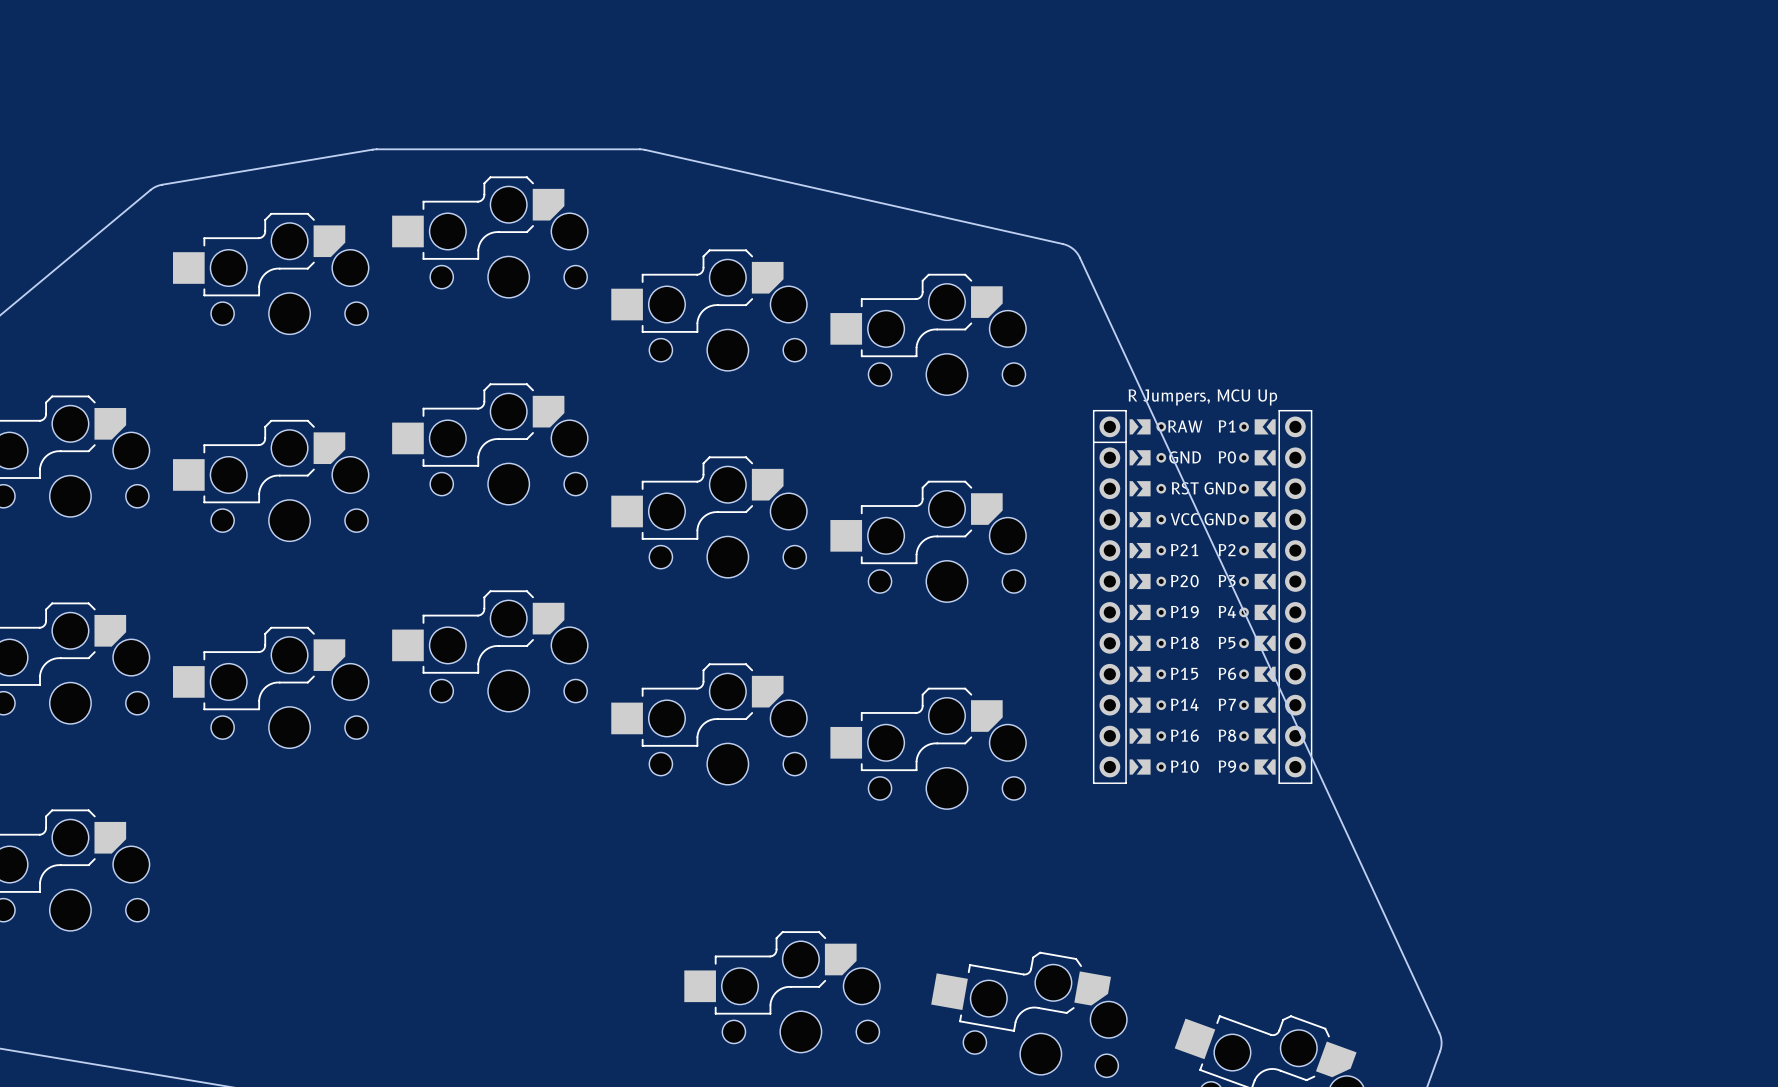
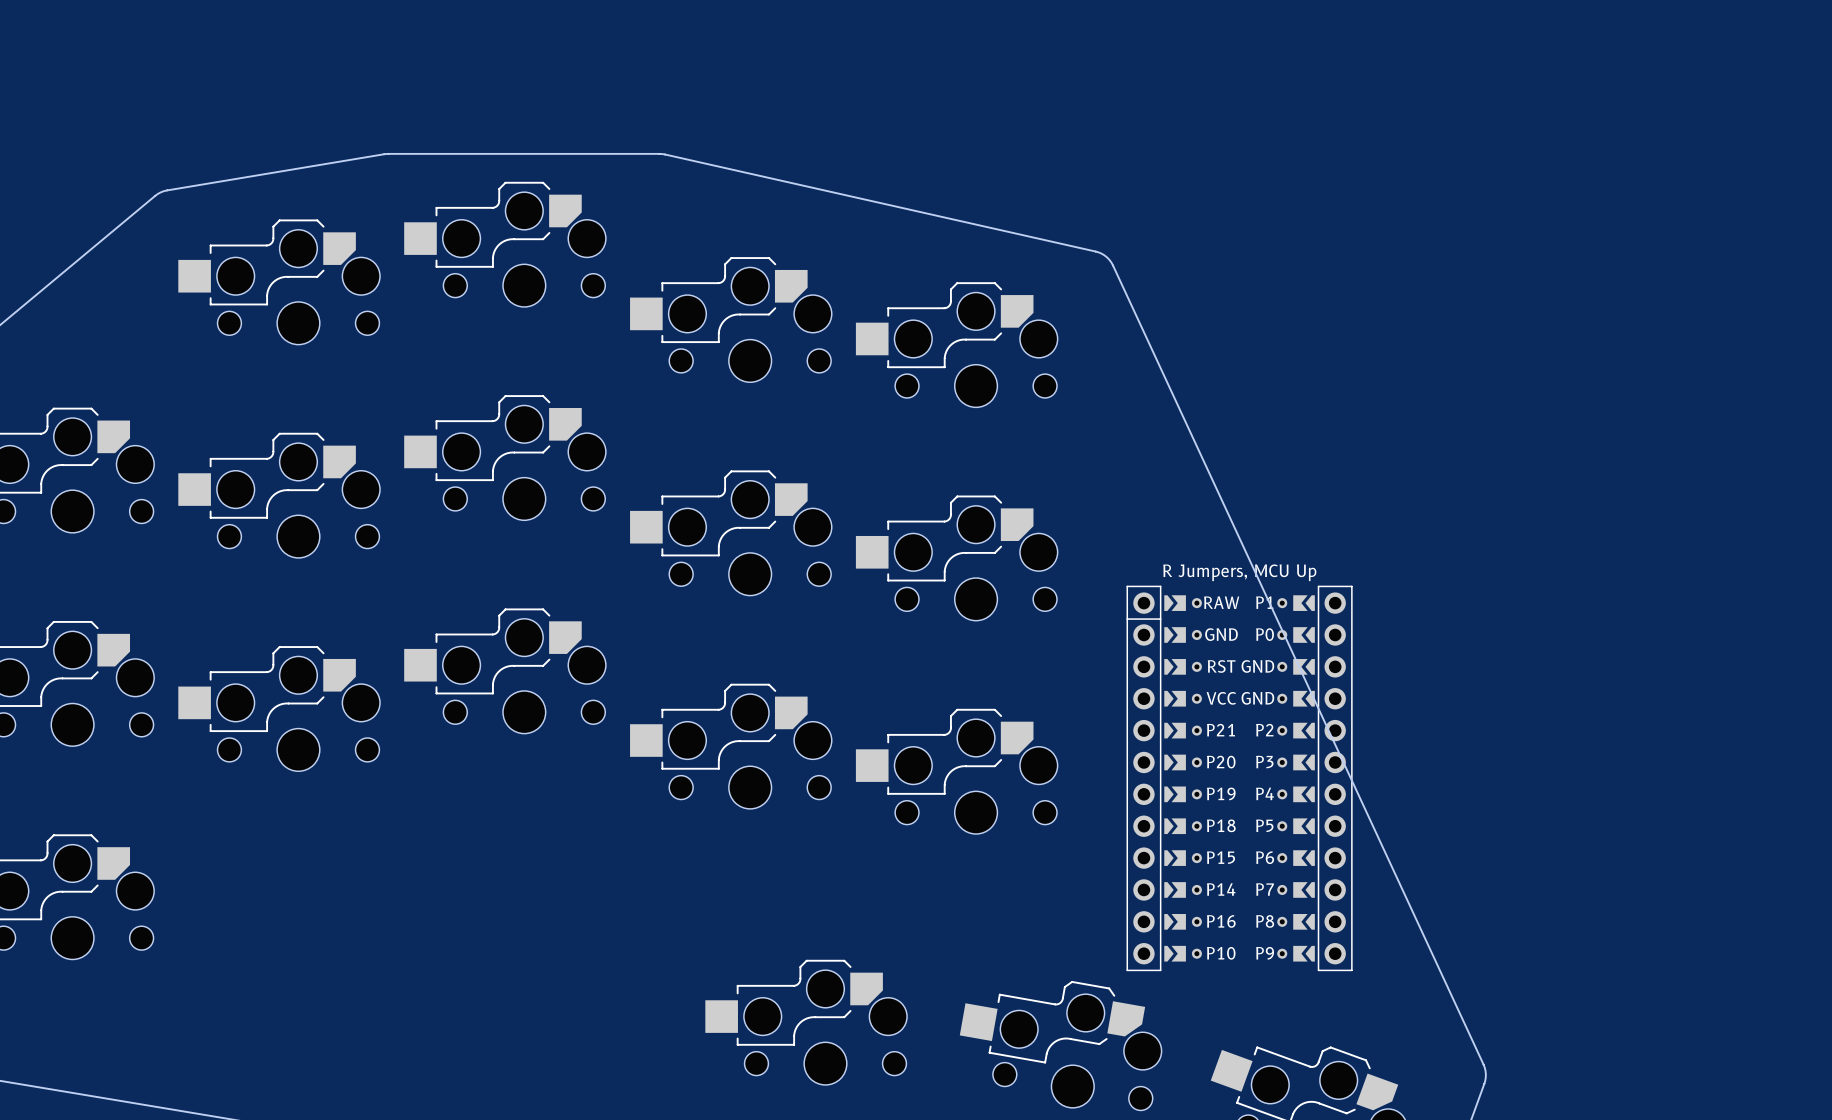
part position: (1202, 596) -> (1239, 778)

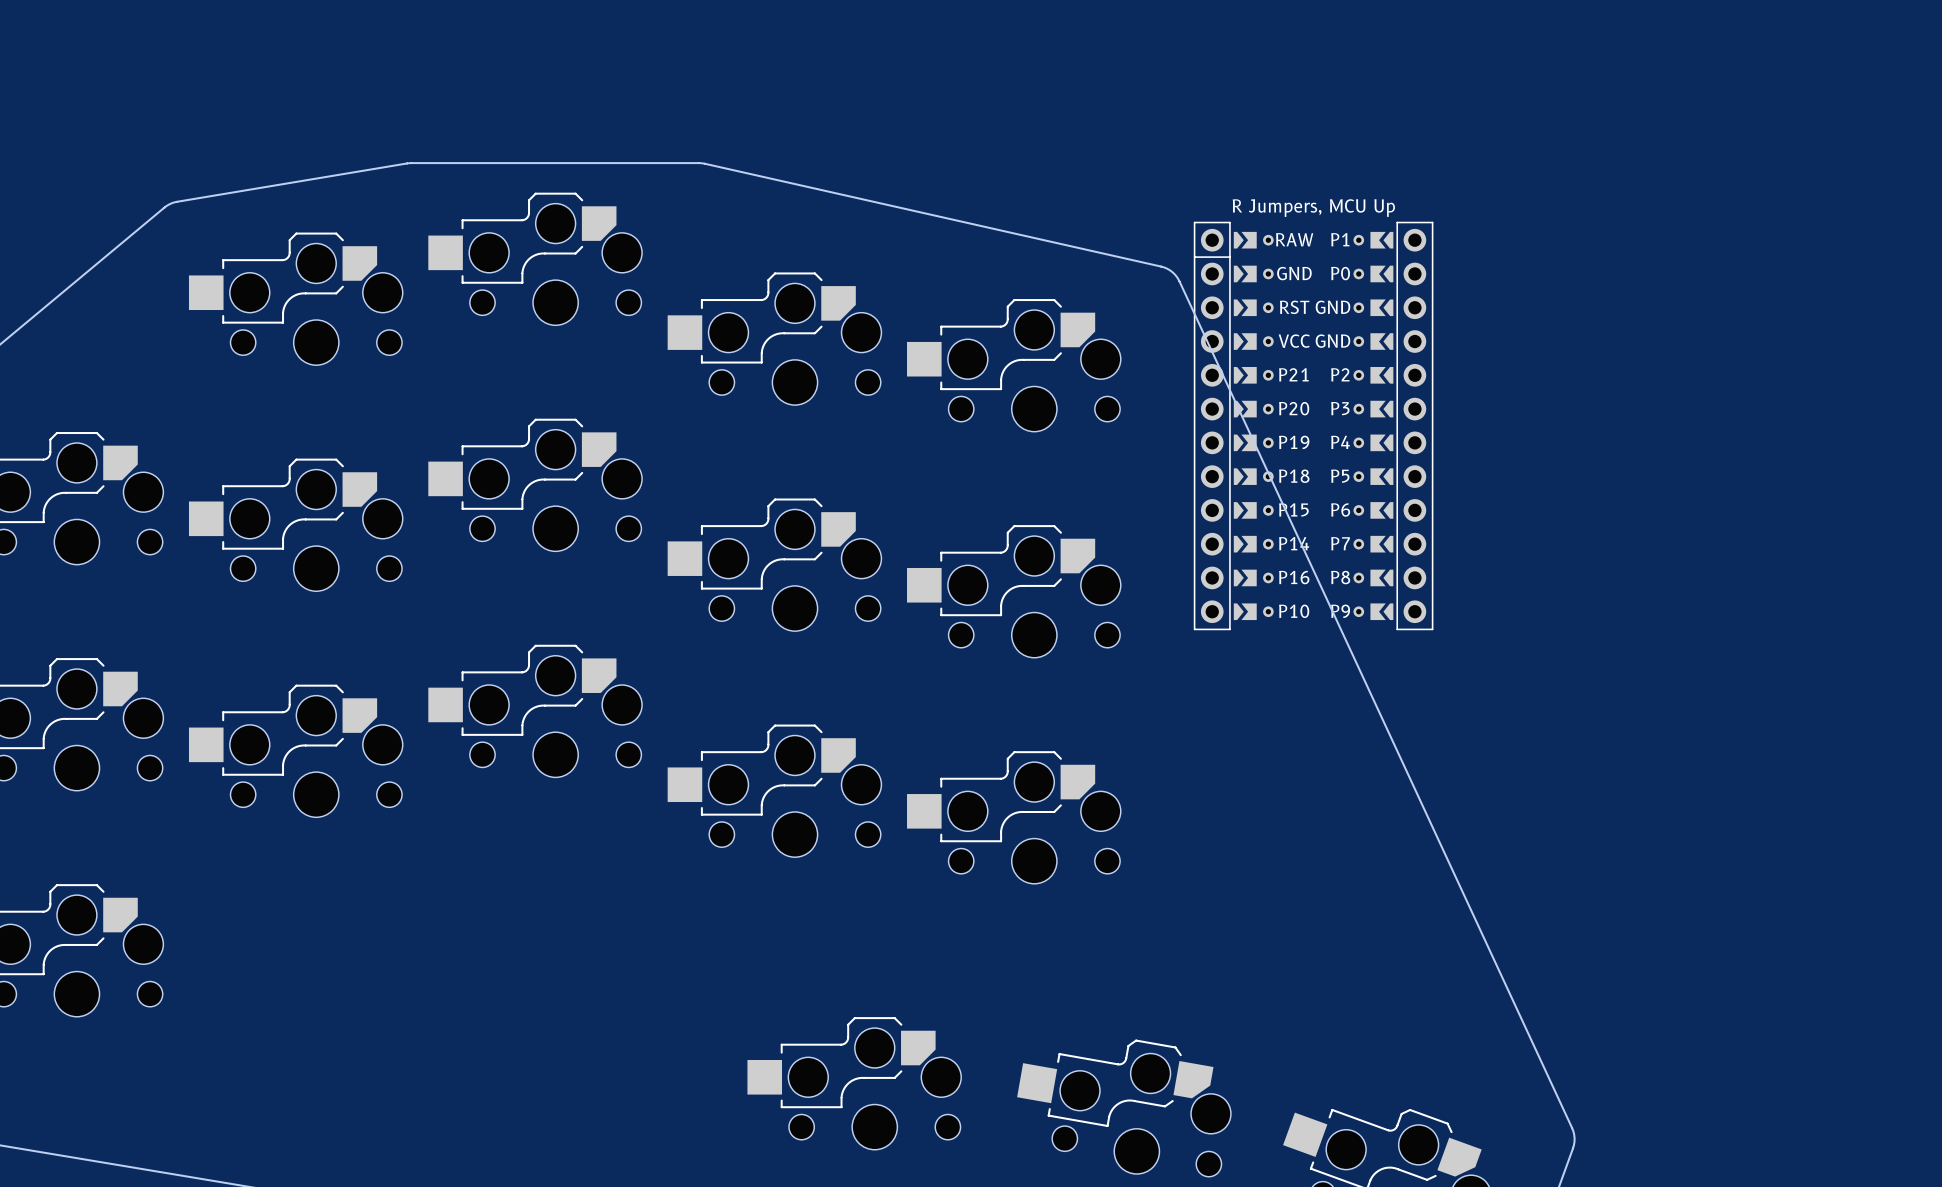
part: none -> (1313, 425)
part: (1239, 778) -> none

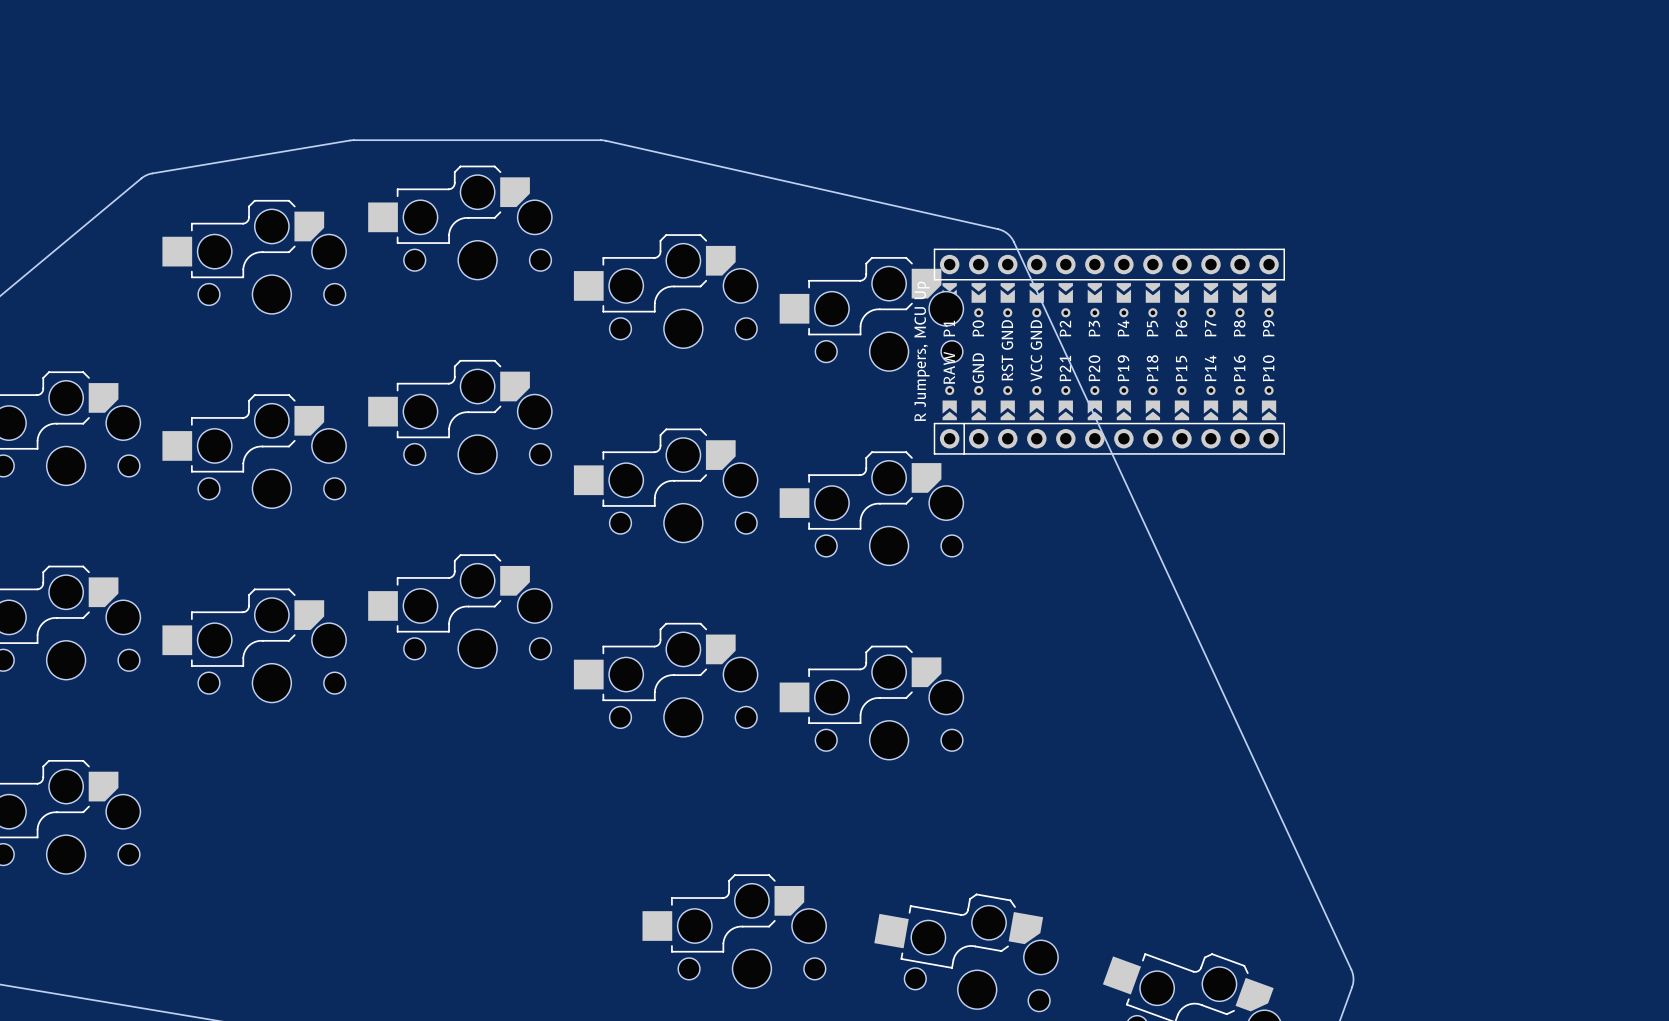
part rotation: 0° (1313, 425) -> 90° counterclockwise (1109, 351)

